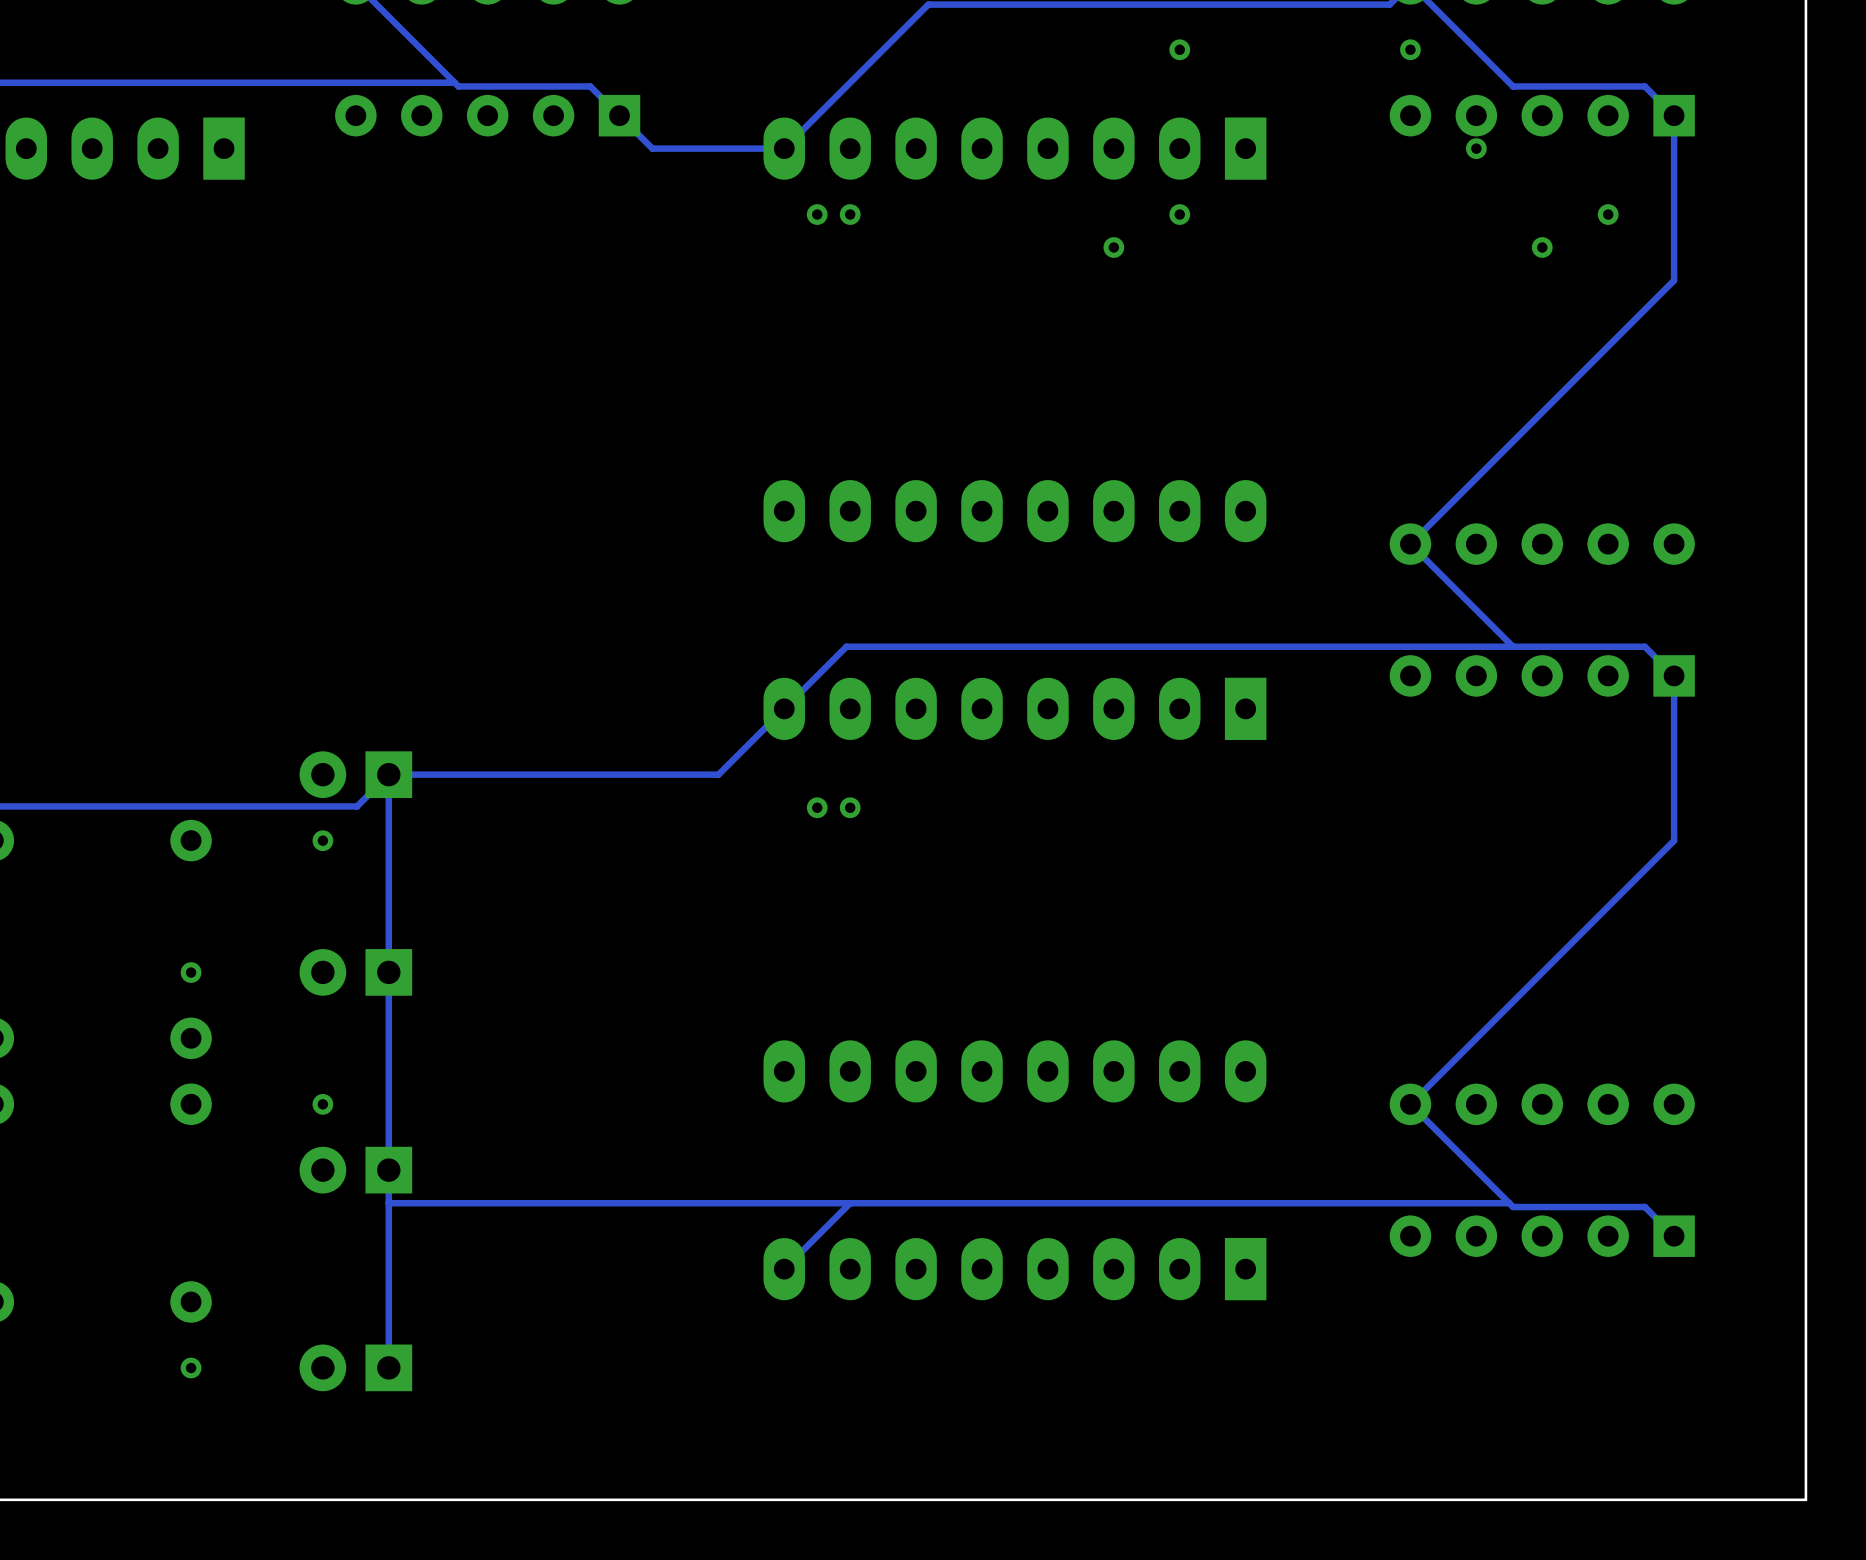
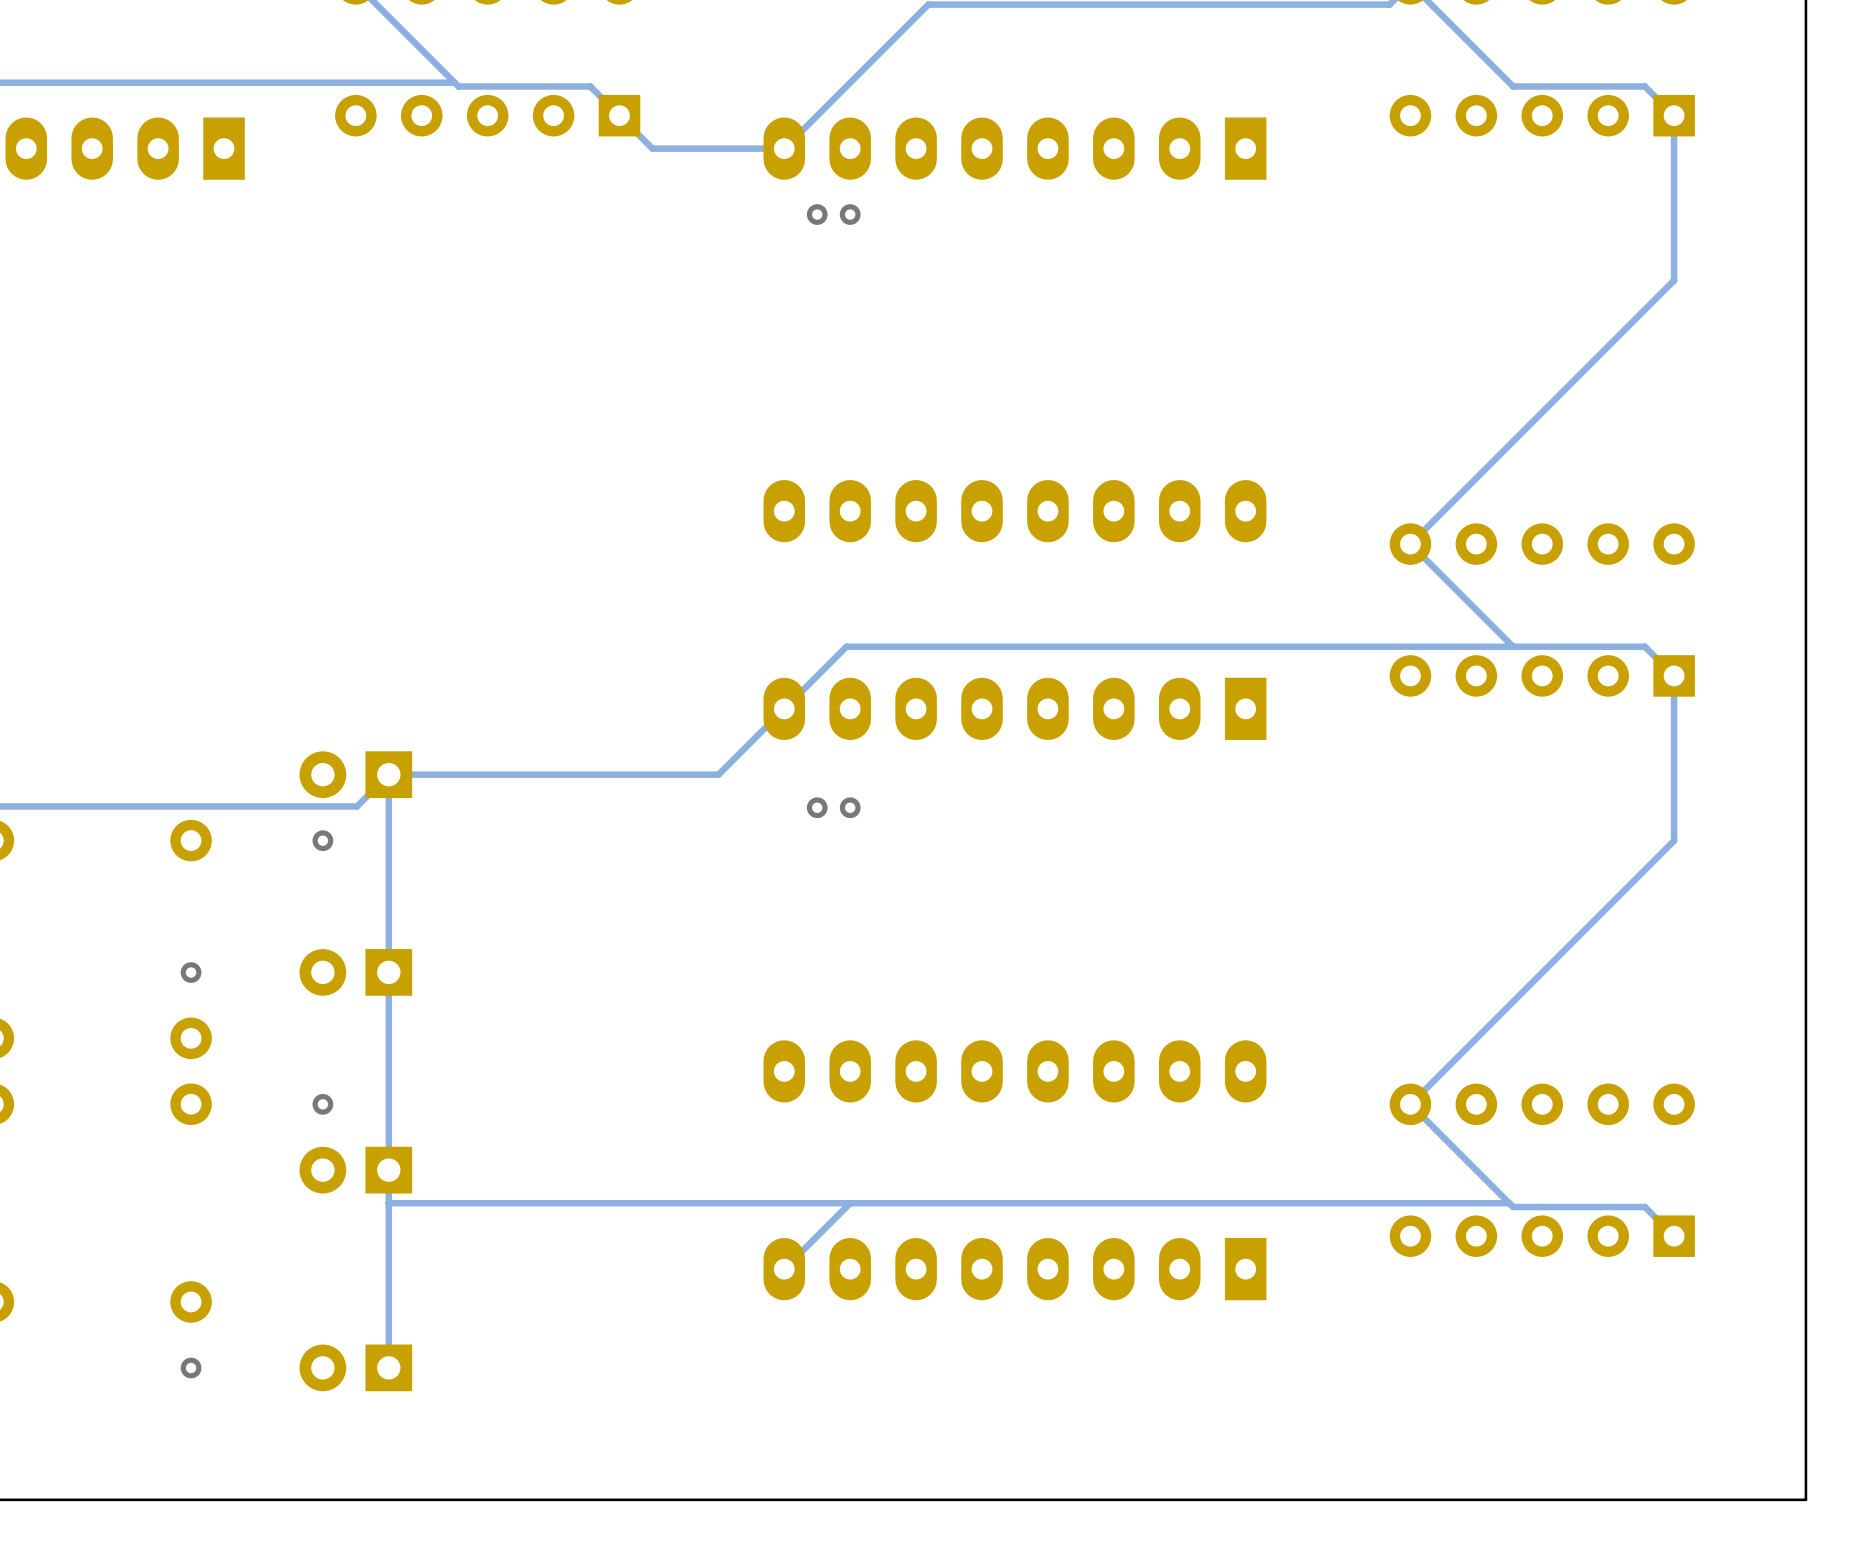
via: (1179, 49) -> none
via: (1410, 49) -> none
via: (1476, 148) -> none
via: (1179, 214) -> none
via: (1608, 214) -> none
via: (1113, 247) -> none
via: (1542, 247) -> none

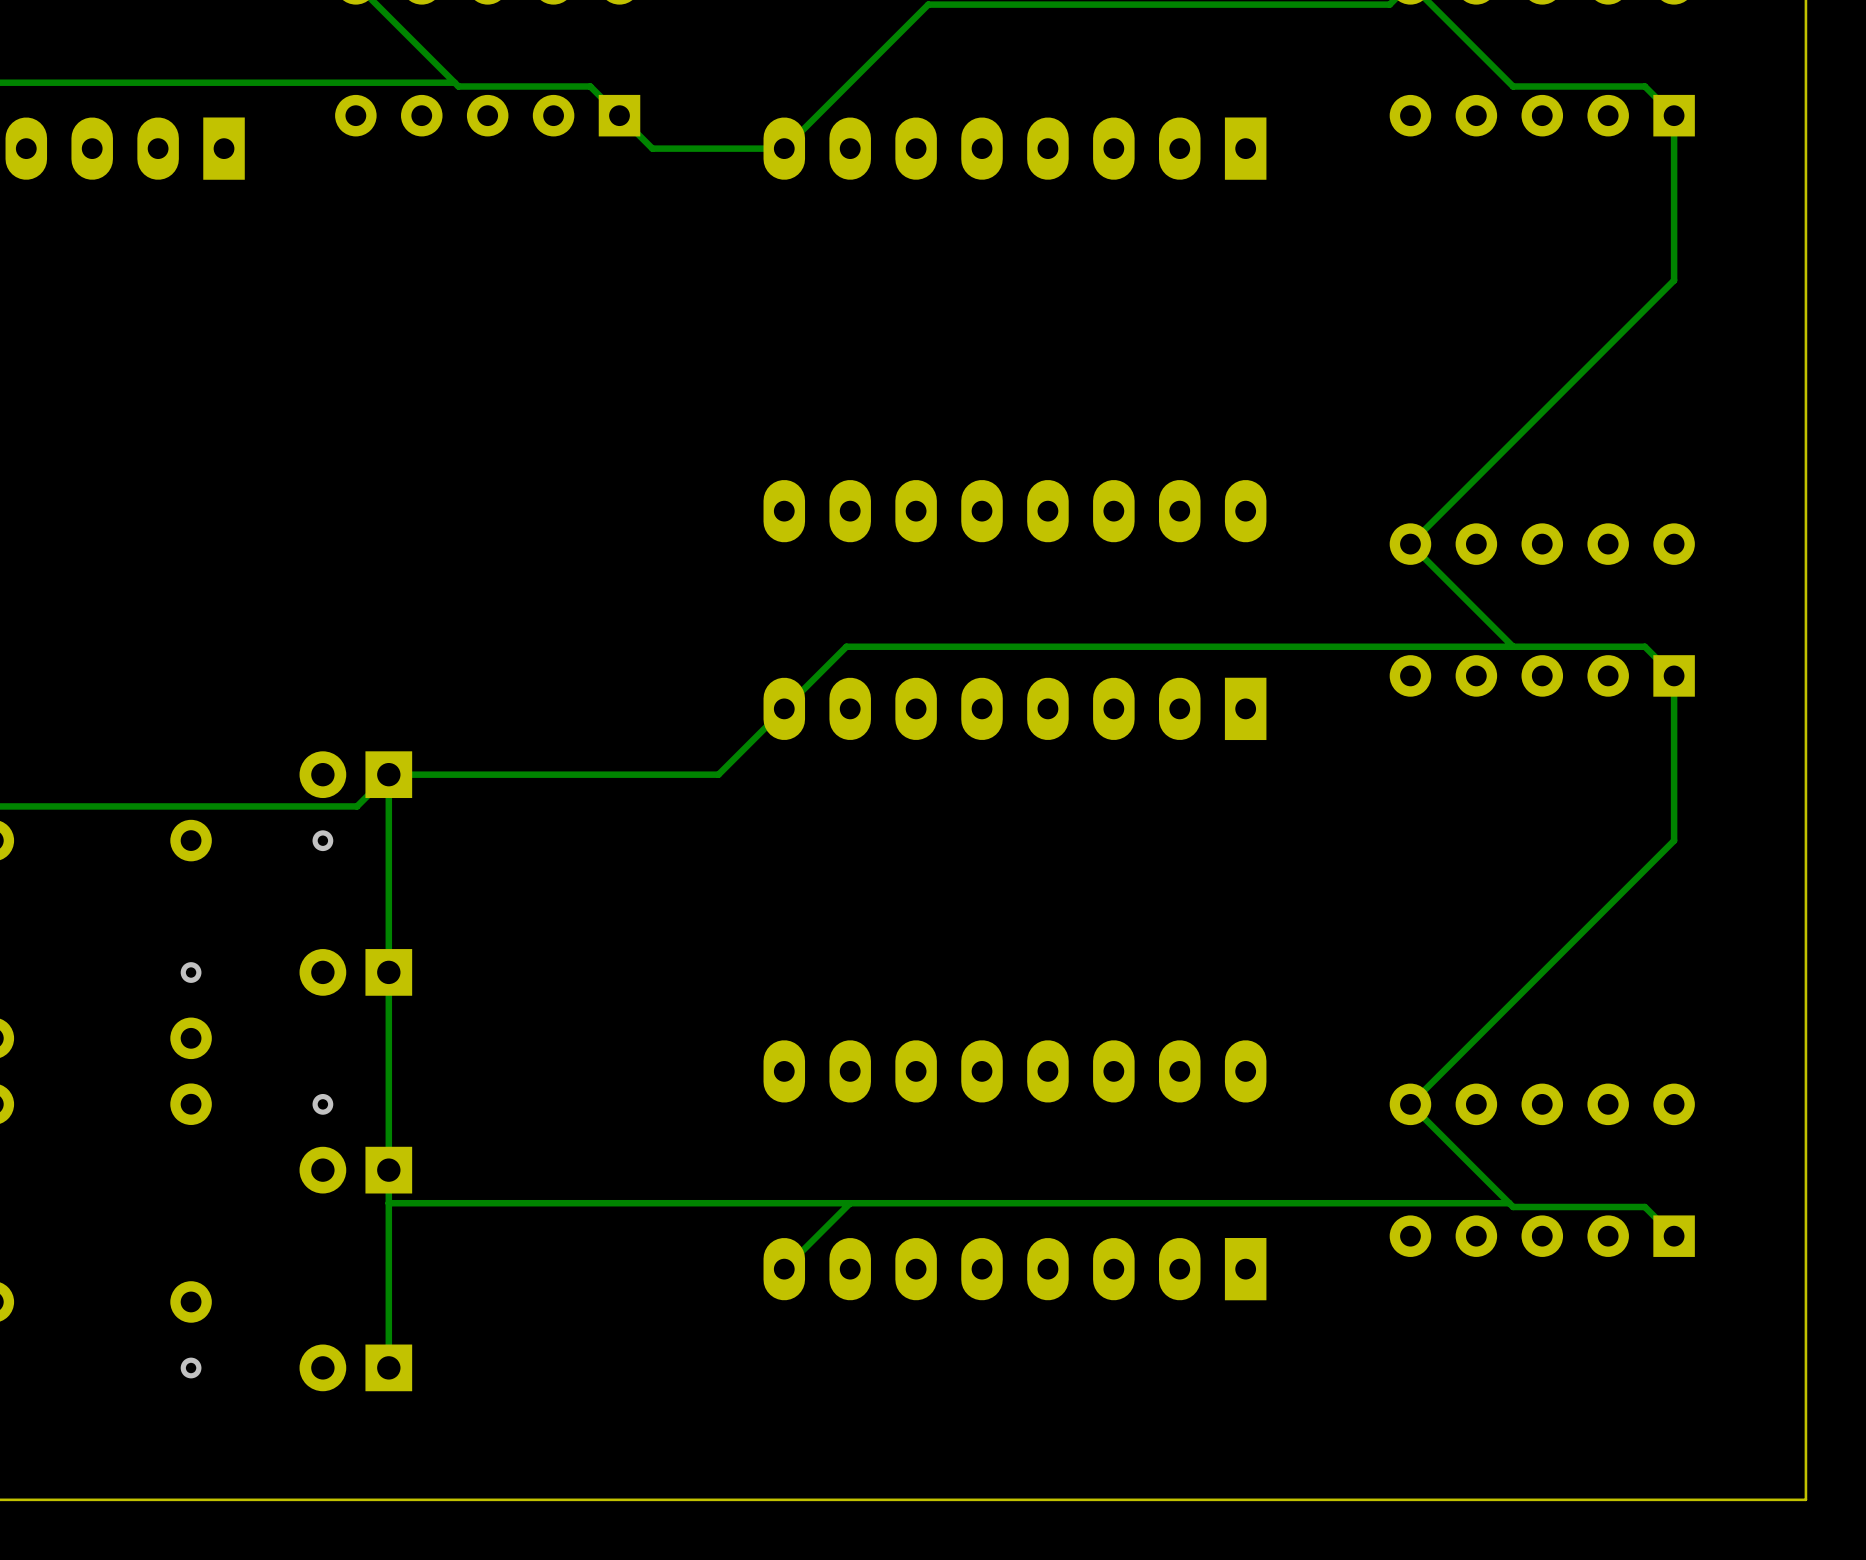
via: (817, 214) -> none
via: (850, 214) -> none
via: (817, 807) -> none
via: (850, 807) -> none

